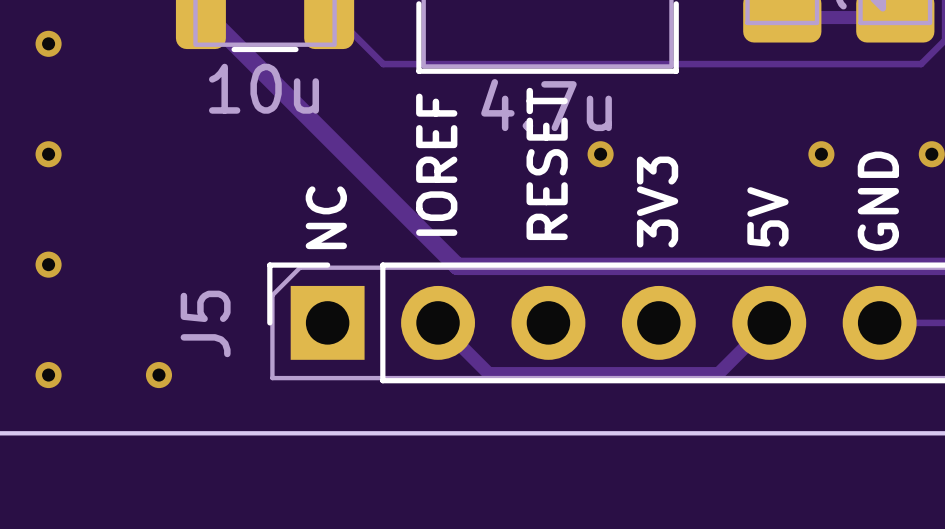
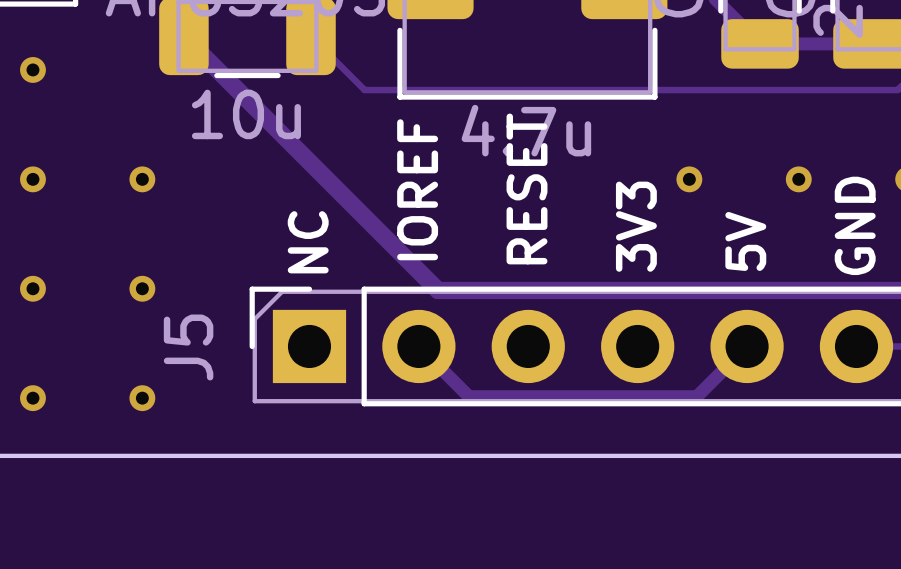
via: none -> (142, 179)
via position: (600, 154) -> (689, 179)
via: none -> (142, 288)

